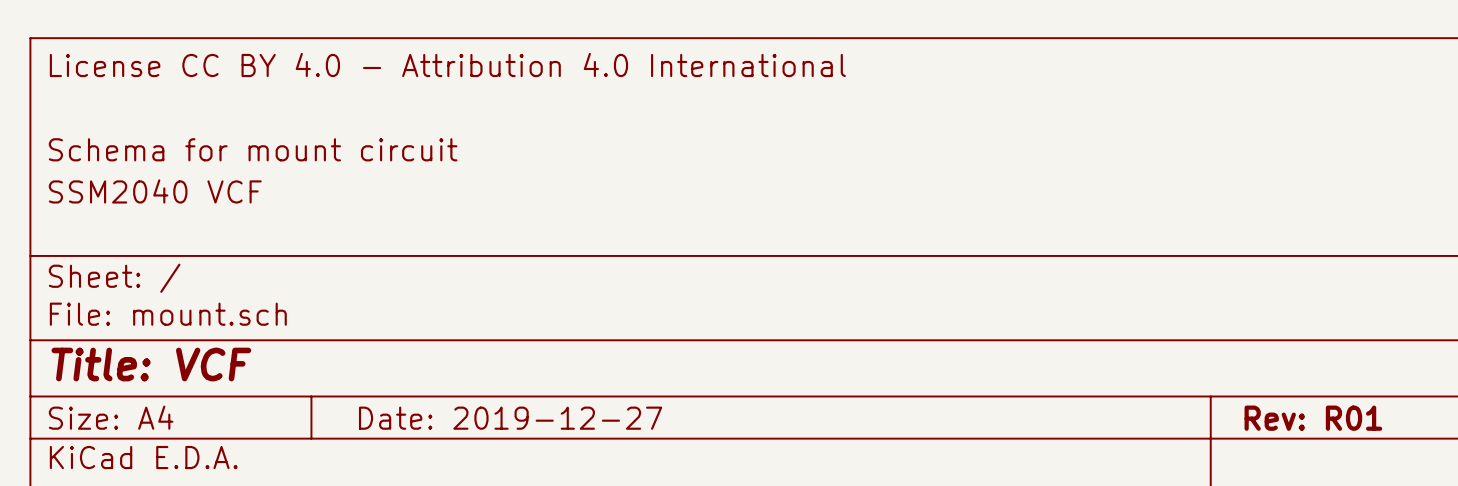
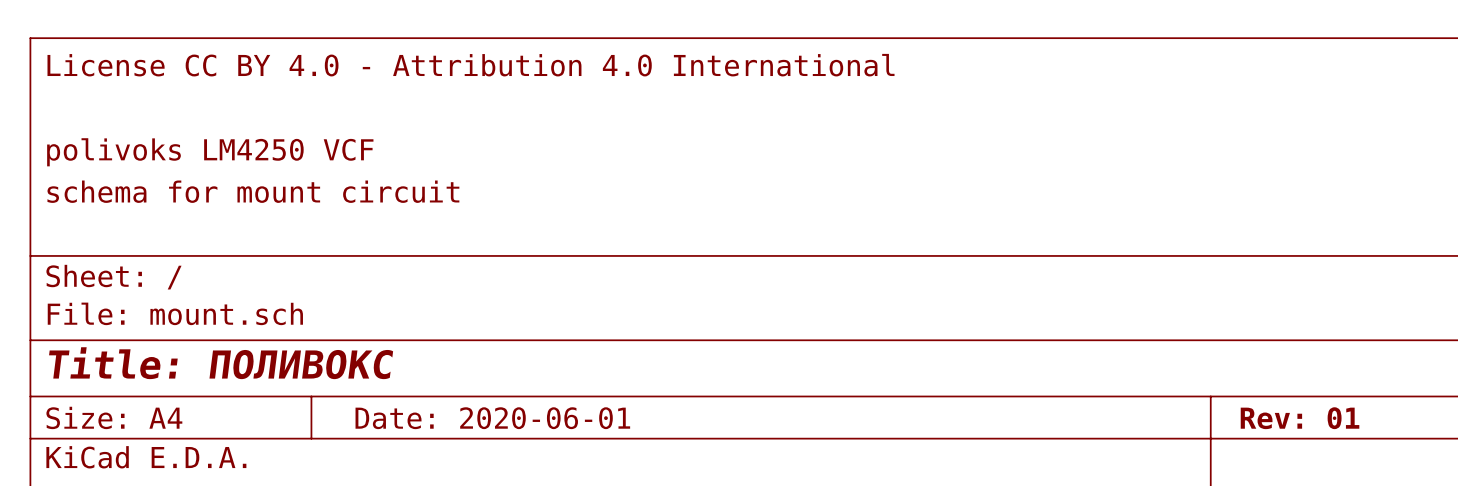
title block: Schema for mount circuit (253, 149) -> polivoks LM4250 VCF (210, 152)
title block: SSM2040 VCF (155, 191) -> schema for mount circuit (253, 191)
title block: Title: VCF (151, 364) -> Title: ПОЛИВОКС (221, 363)
title block: Date: 2019-12-27 (510, 418) -> Date: 2020-06-01 (492, 418)
title block: Rev: R01 (1313, 418) -> Rev: 01 (1300, 418)

